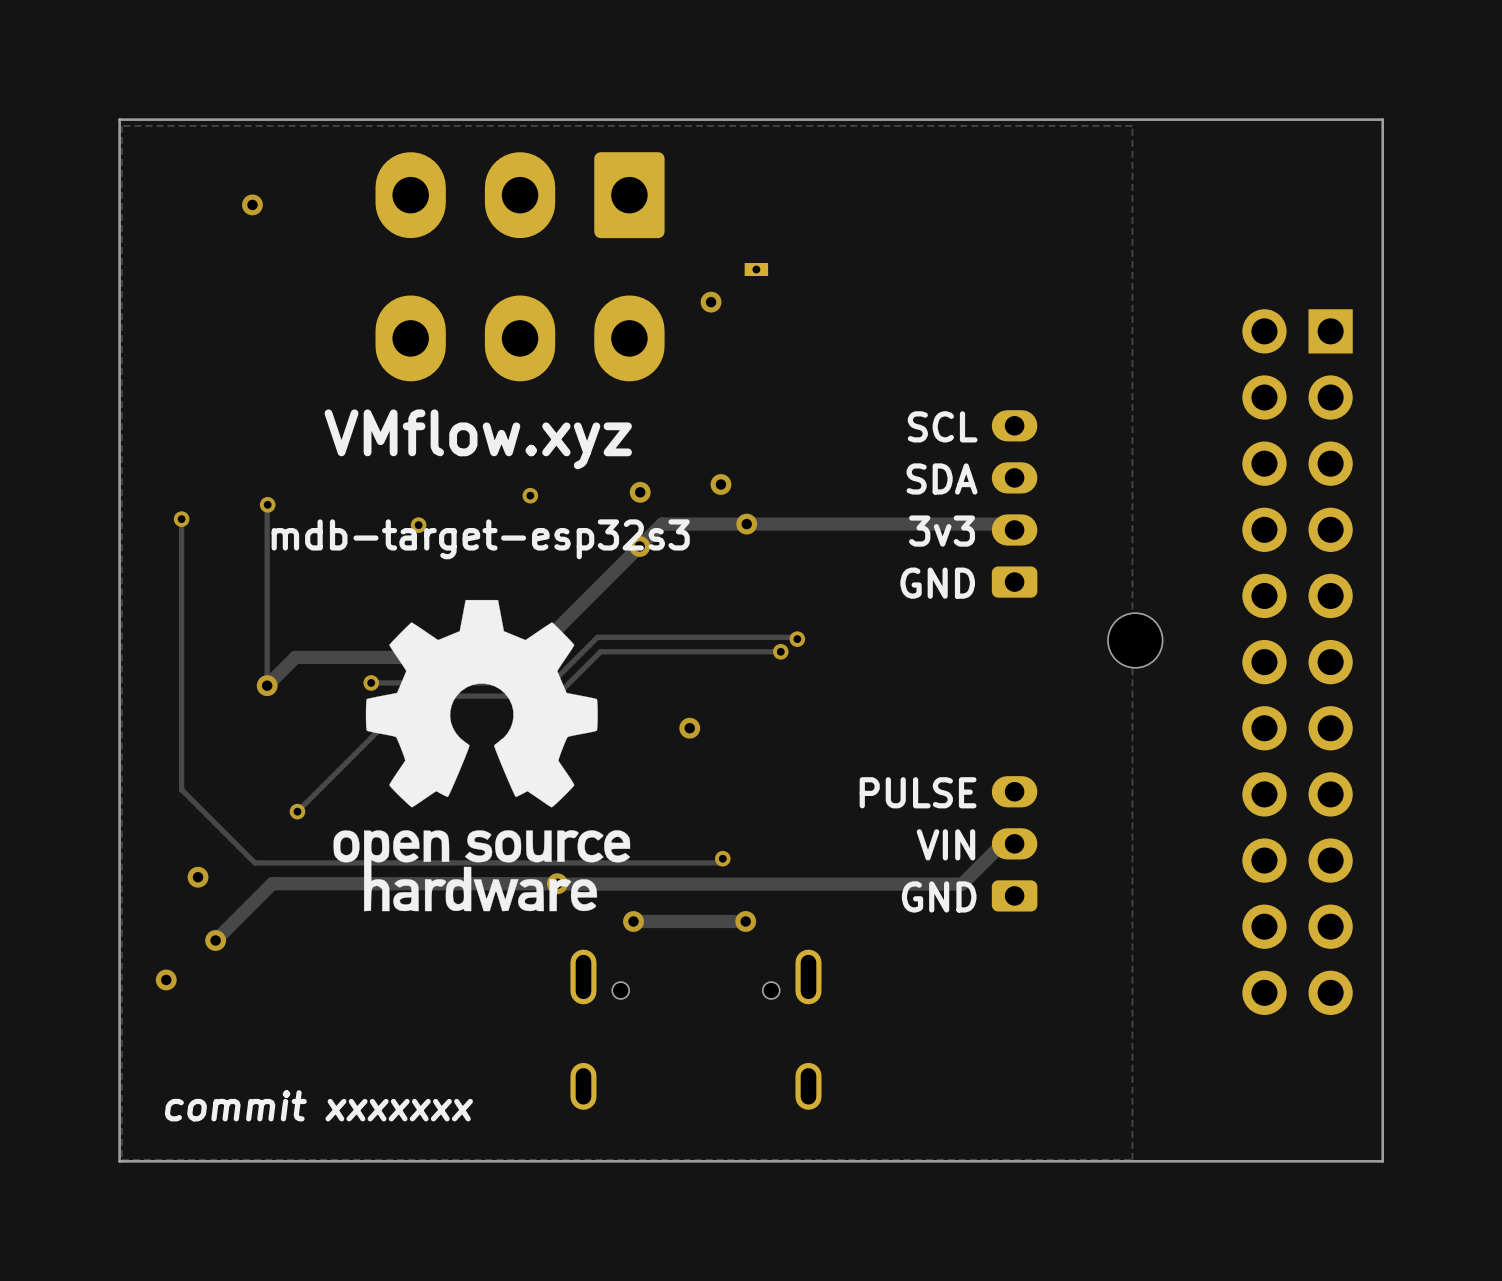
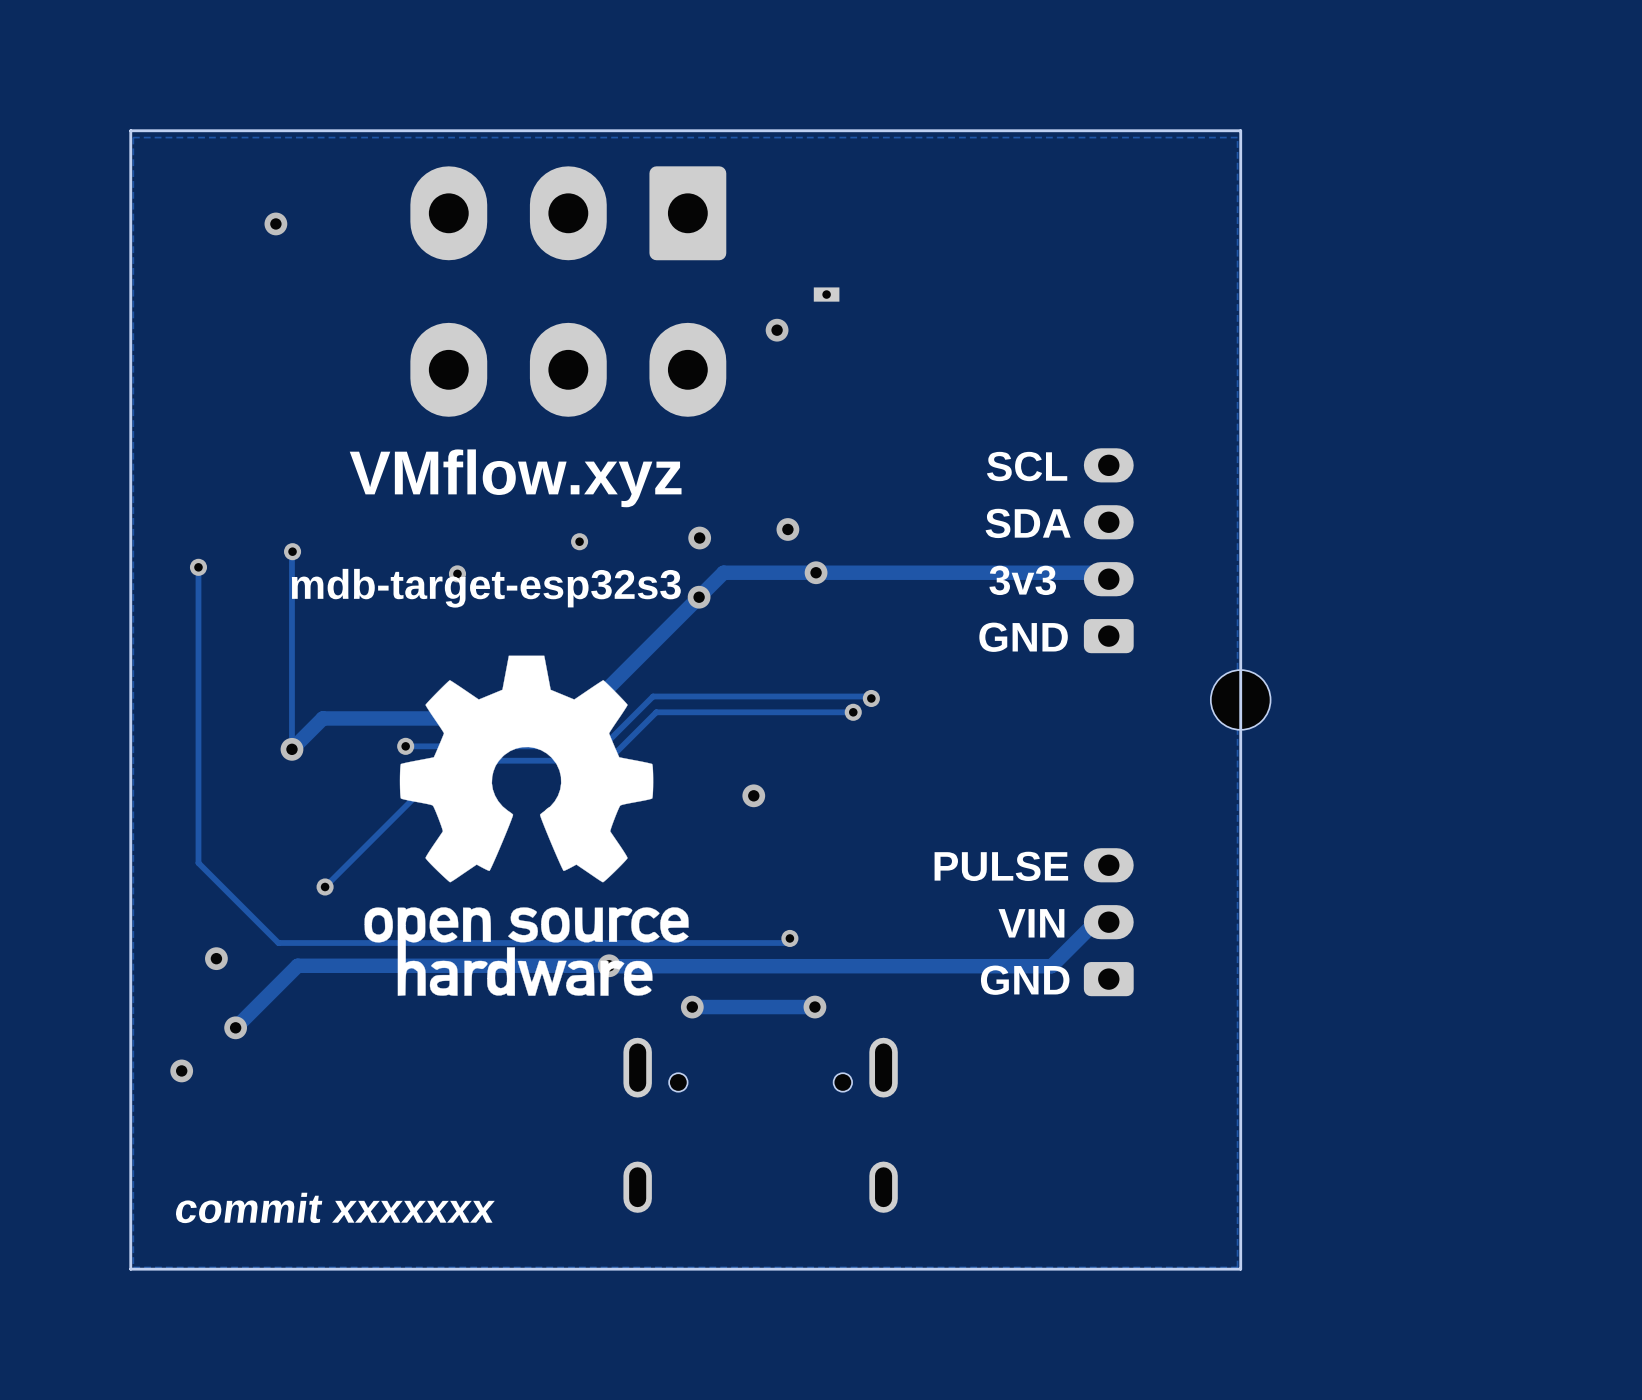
board edge: (1135, 119) (1382, 119) (1382, 1161) (1135, 1161) -> (1240, 130) (1240, 1269)
part: (1297, 662) -> none

